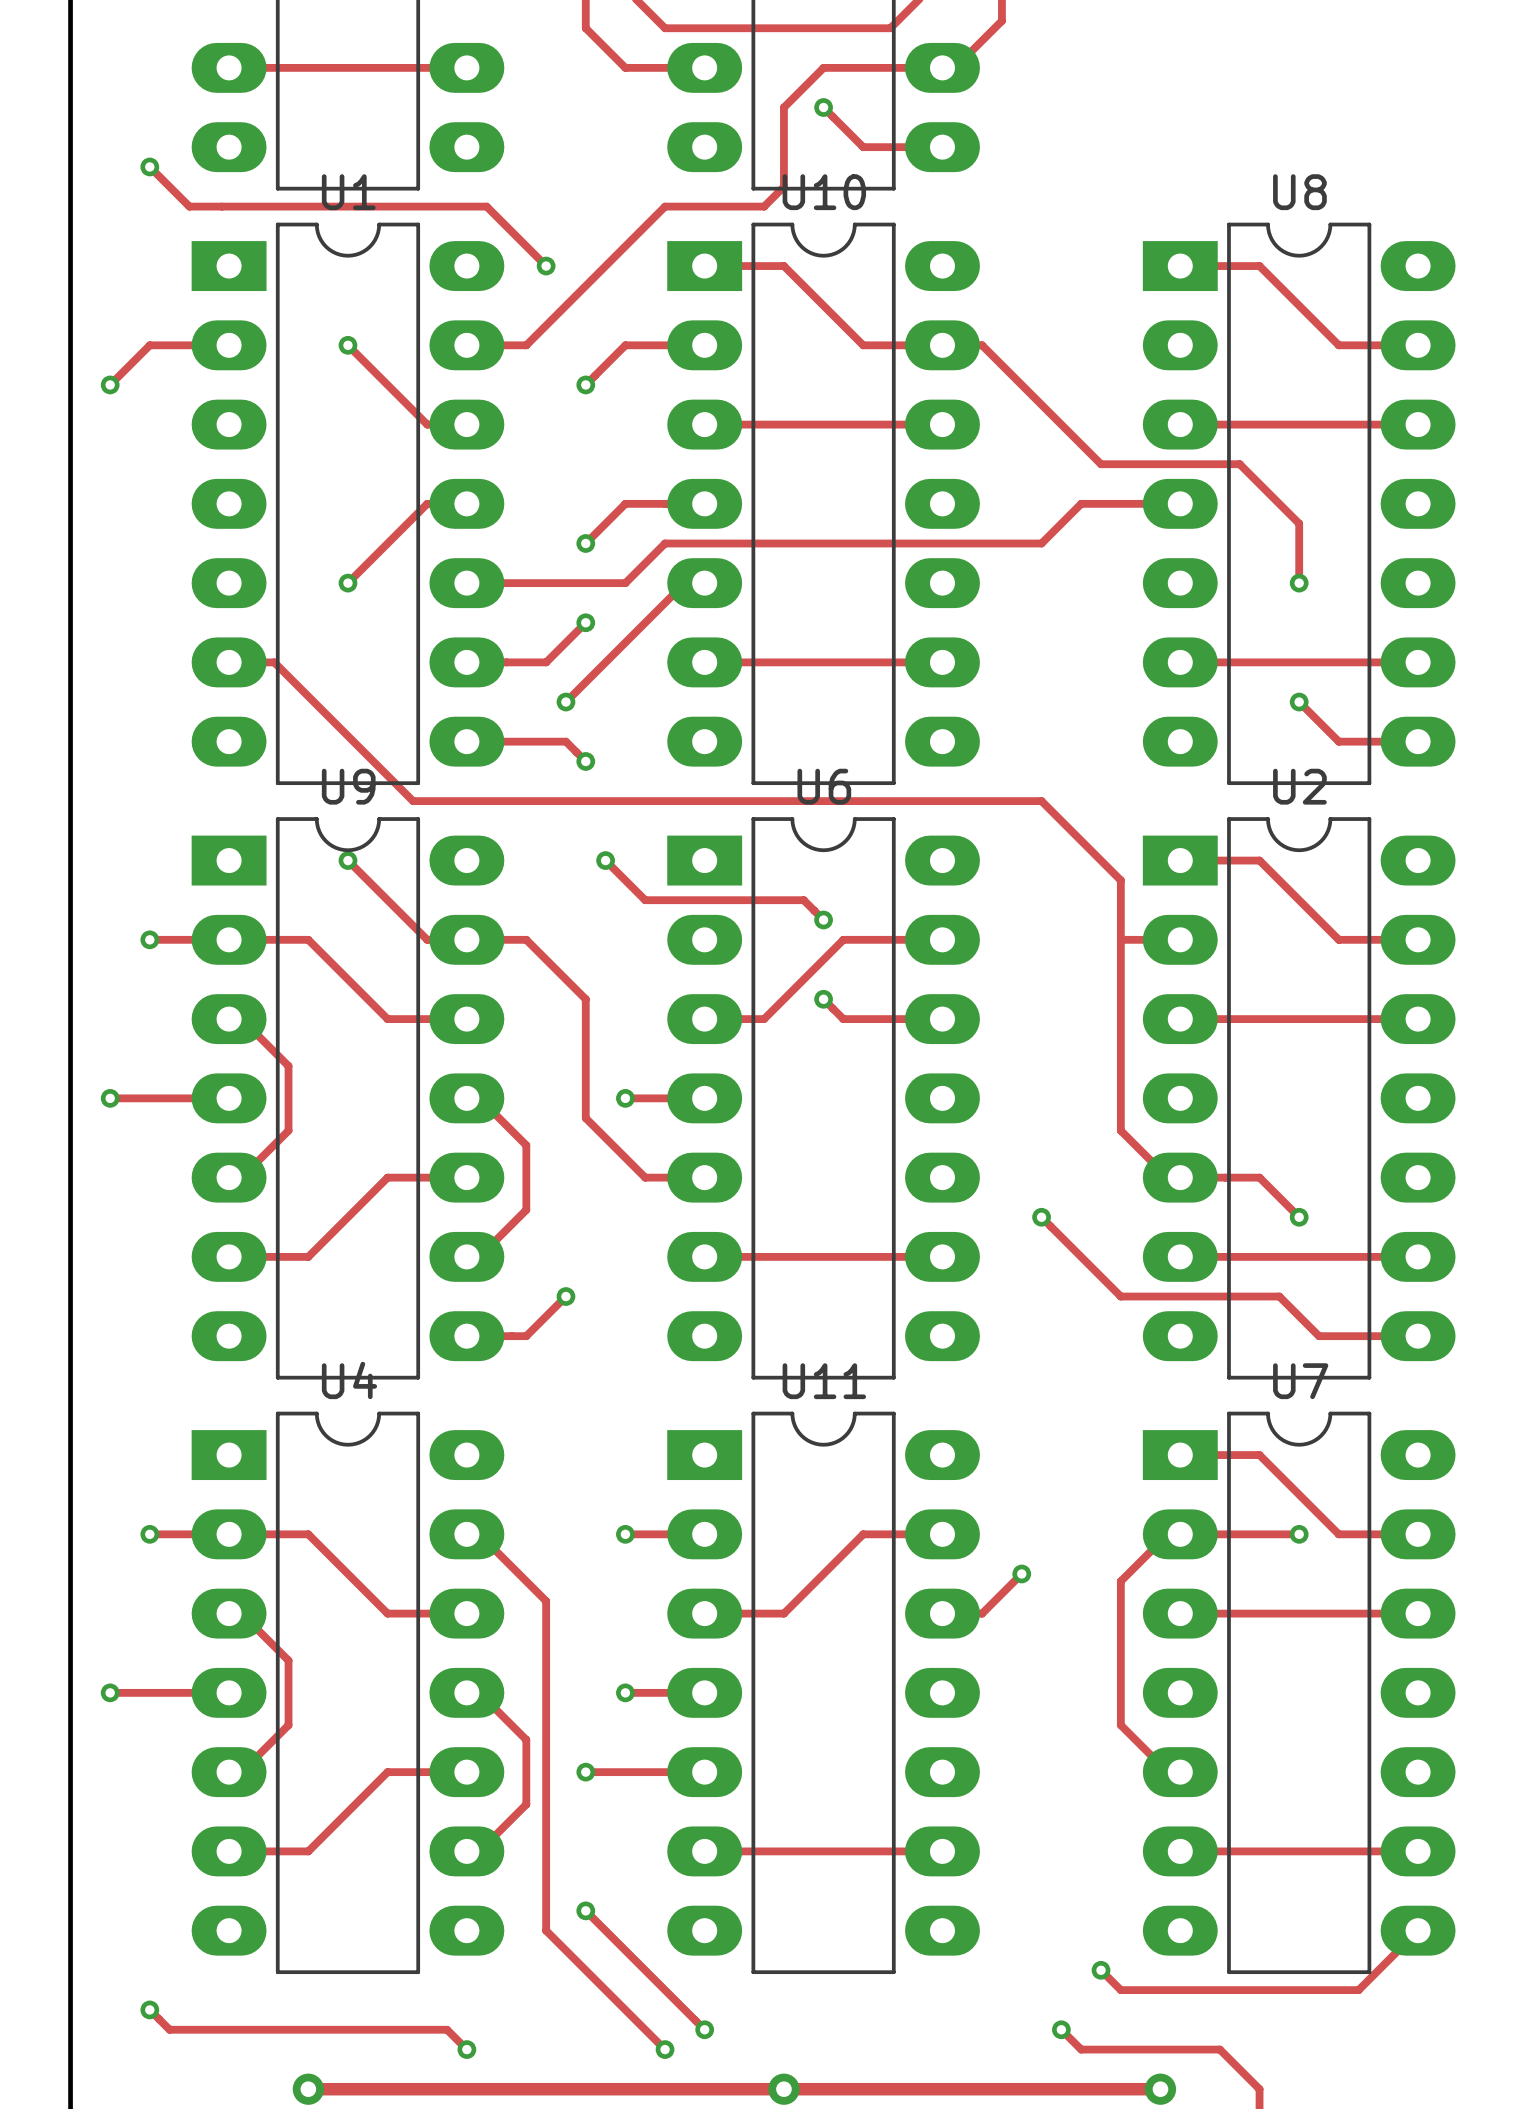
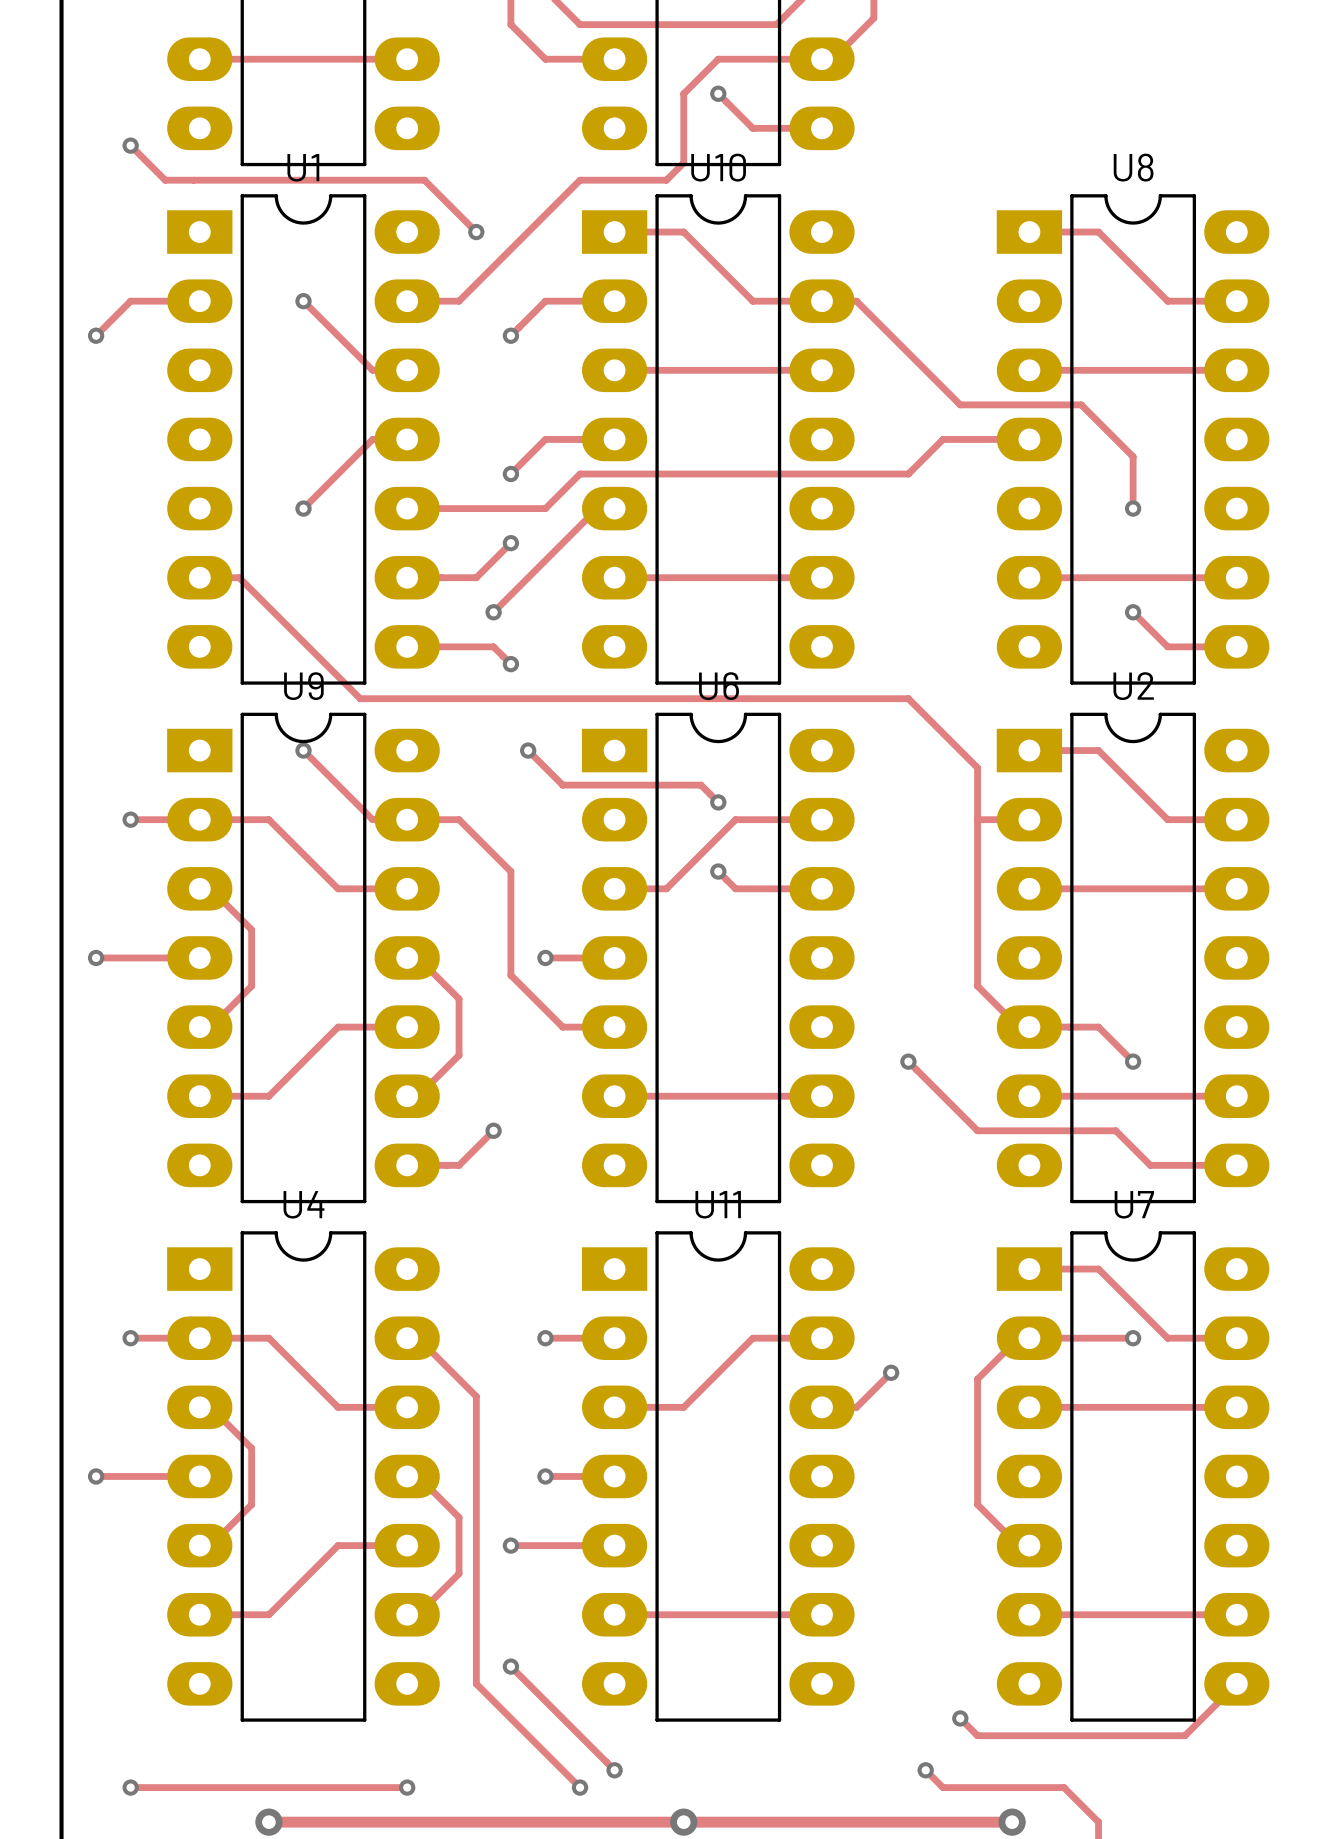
track: (149, 2009) (169, 2029) (447, 2029) (466, 2049) -> (130, 1787) (407, 1787)
via position: (149, 2009) -> (130, 1787)

